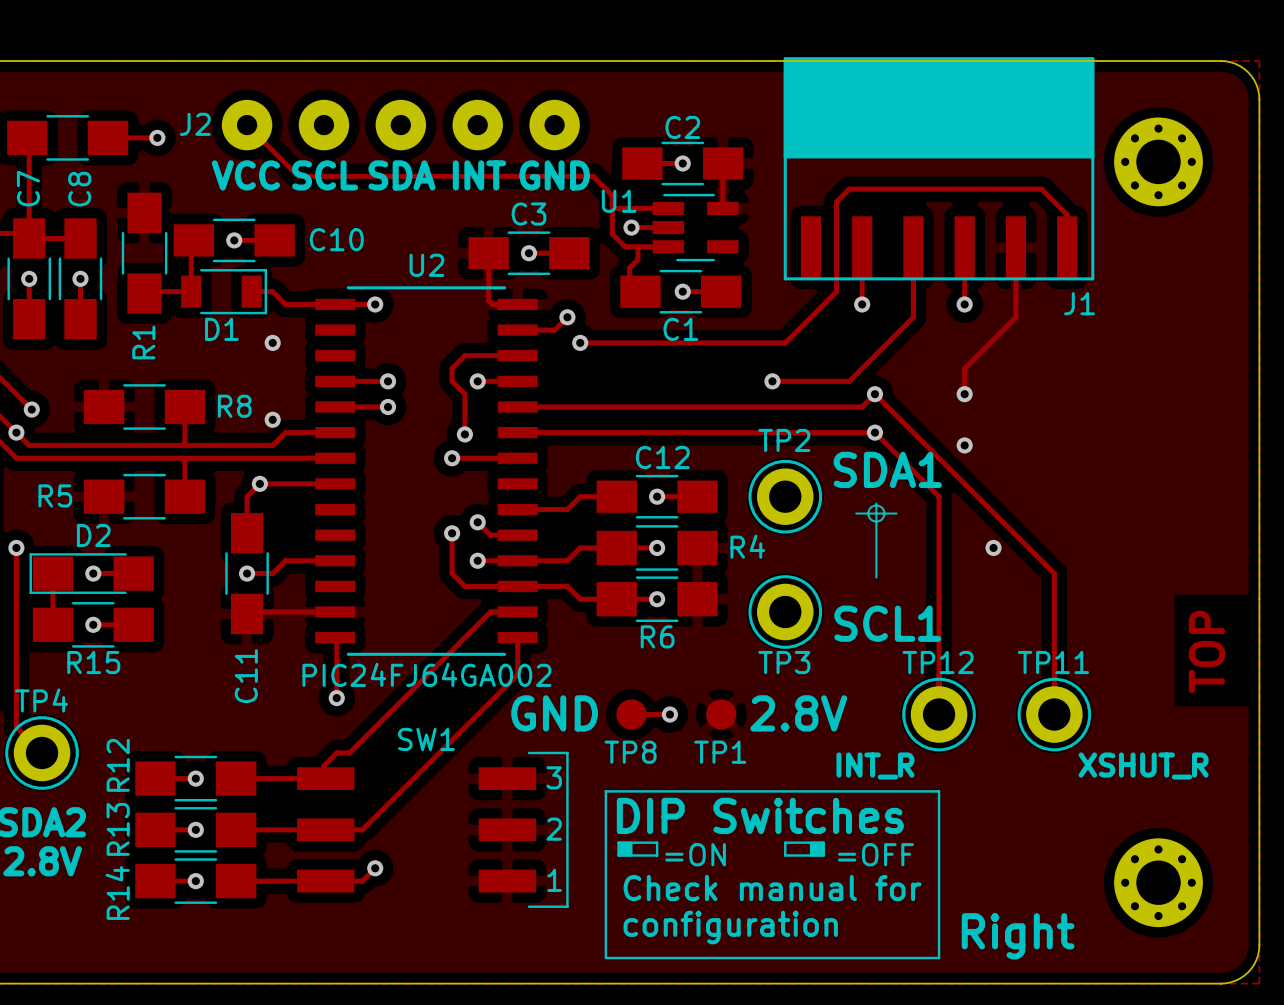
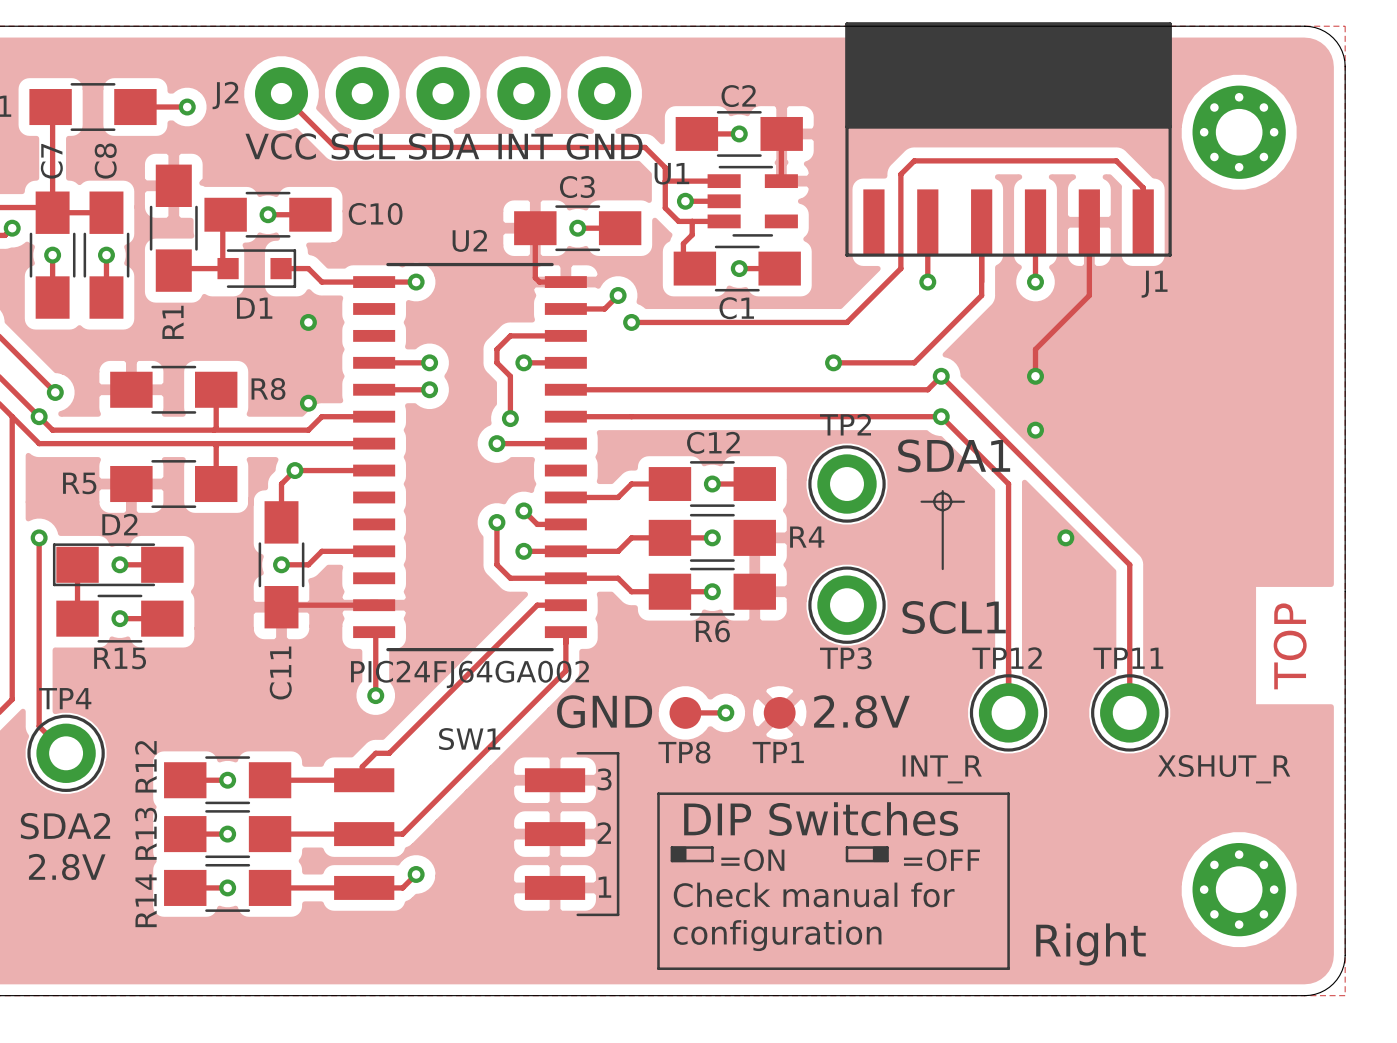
D1 footprint: [181, 269, 268, 315] -> [217, 249, 297, 288]

